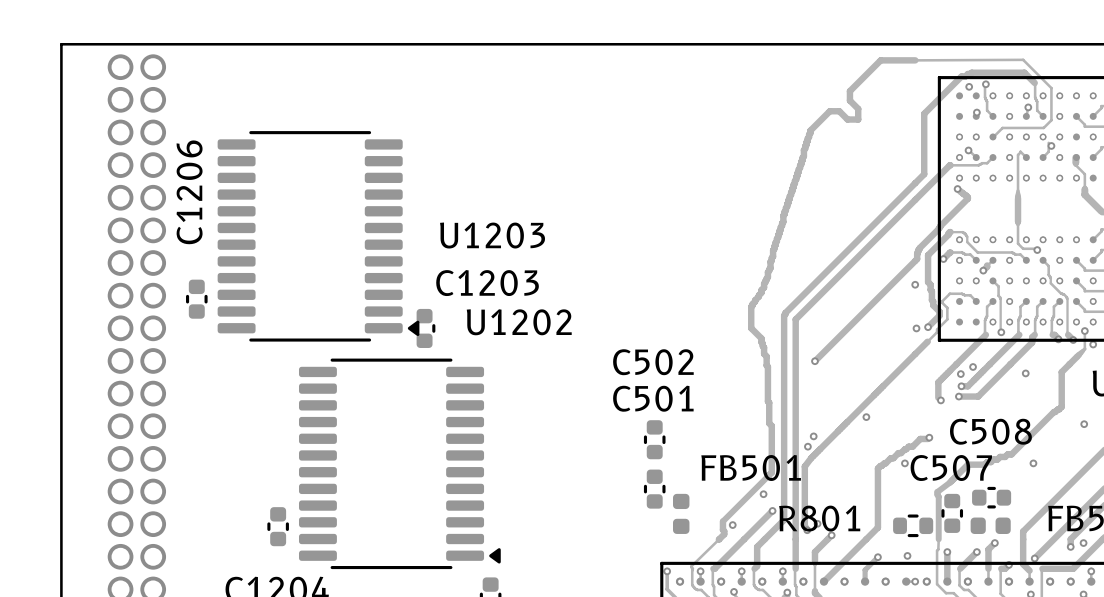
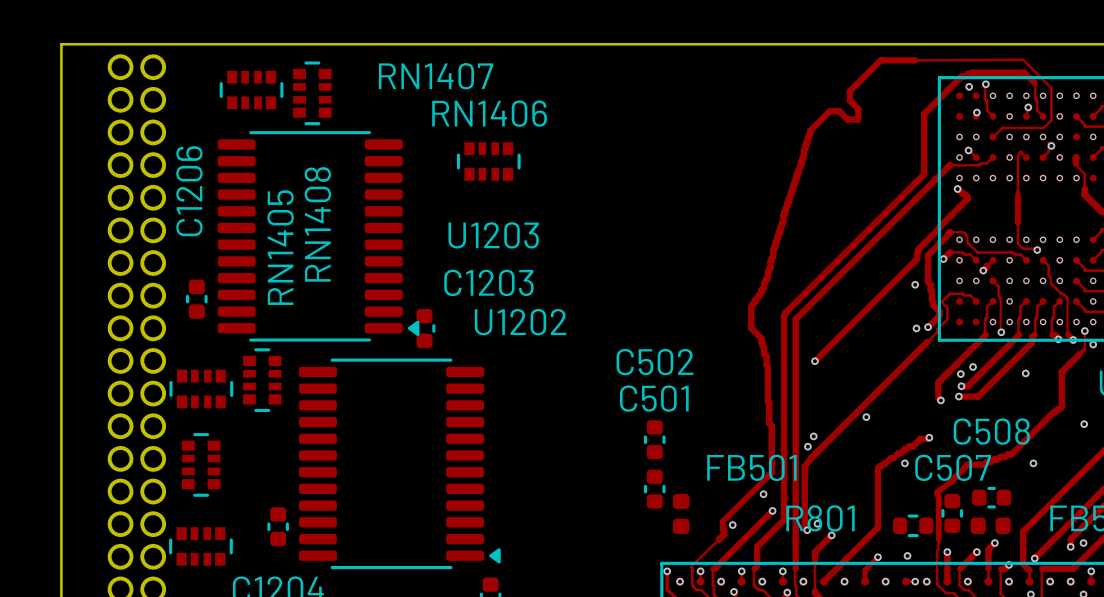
RN1407: none -> (251, 90)
RN1408: none -> (312, 93)
RN1406: none -> (488, 161)
RN1405: none -> (262, 380)
part: none -> (201, 388)
part: none -> (201, 464)
part: none -> (200, 546)

